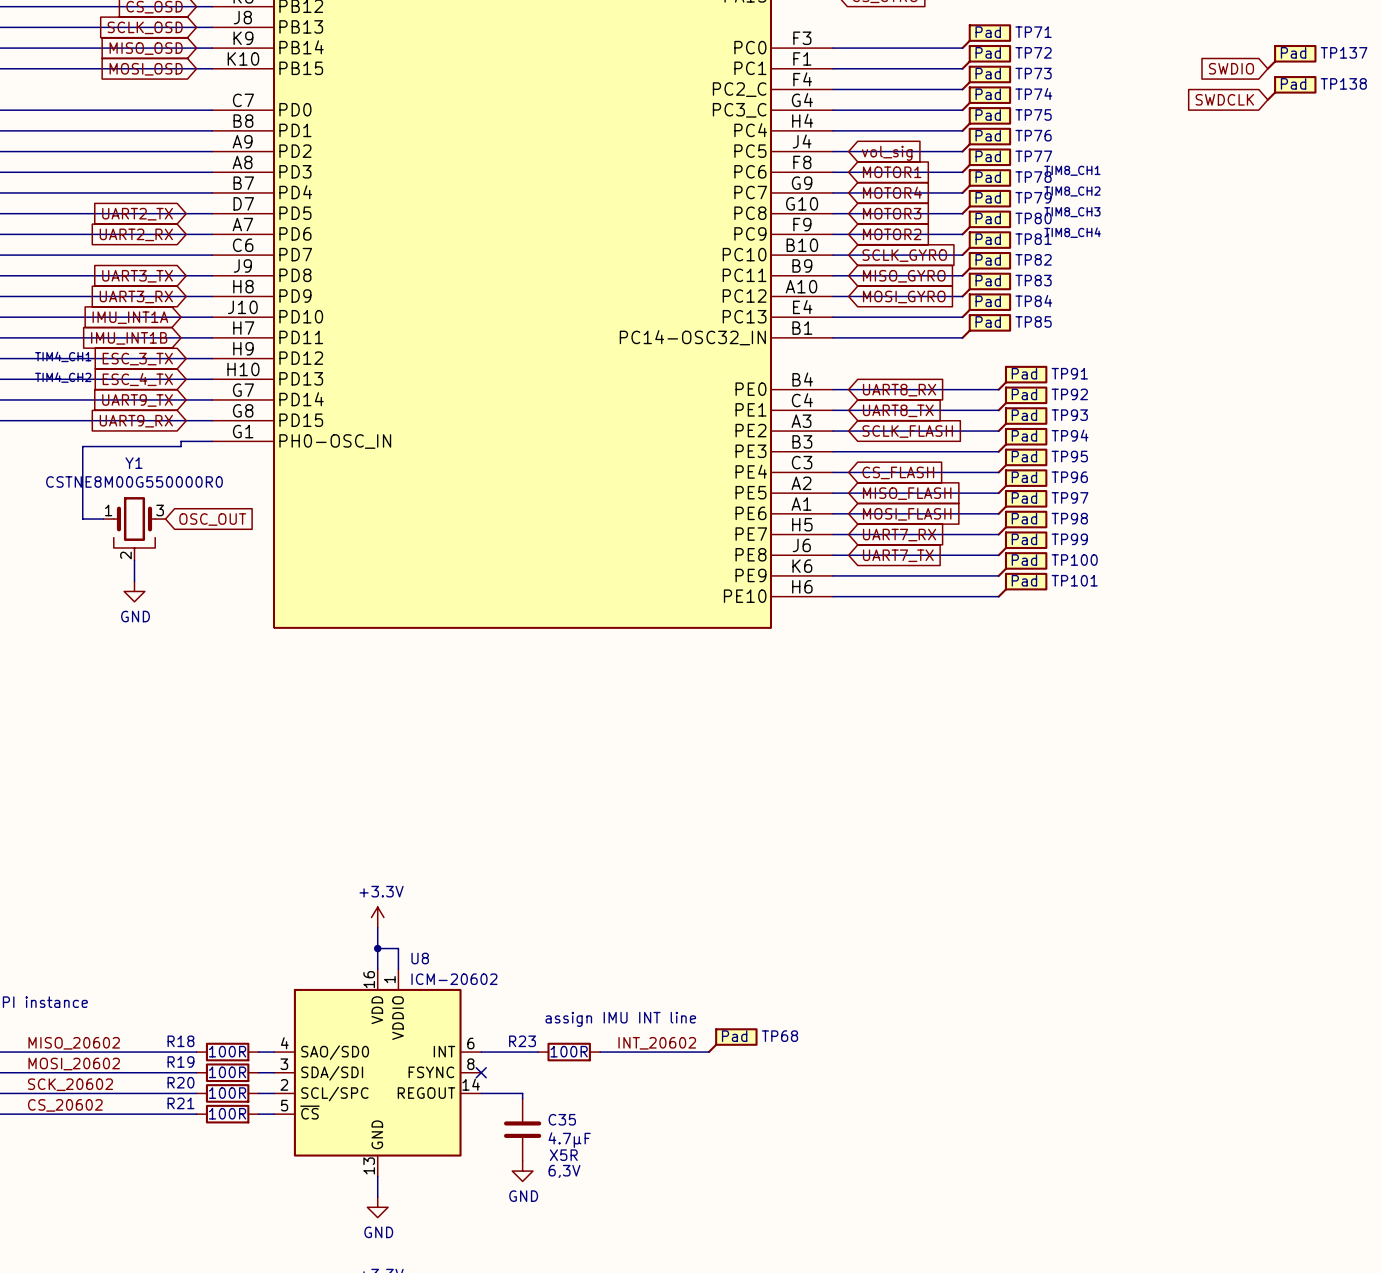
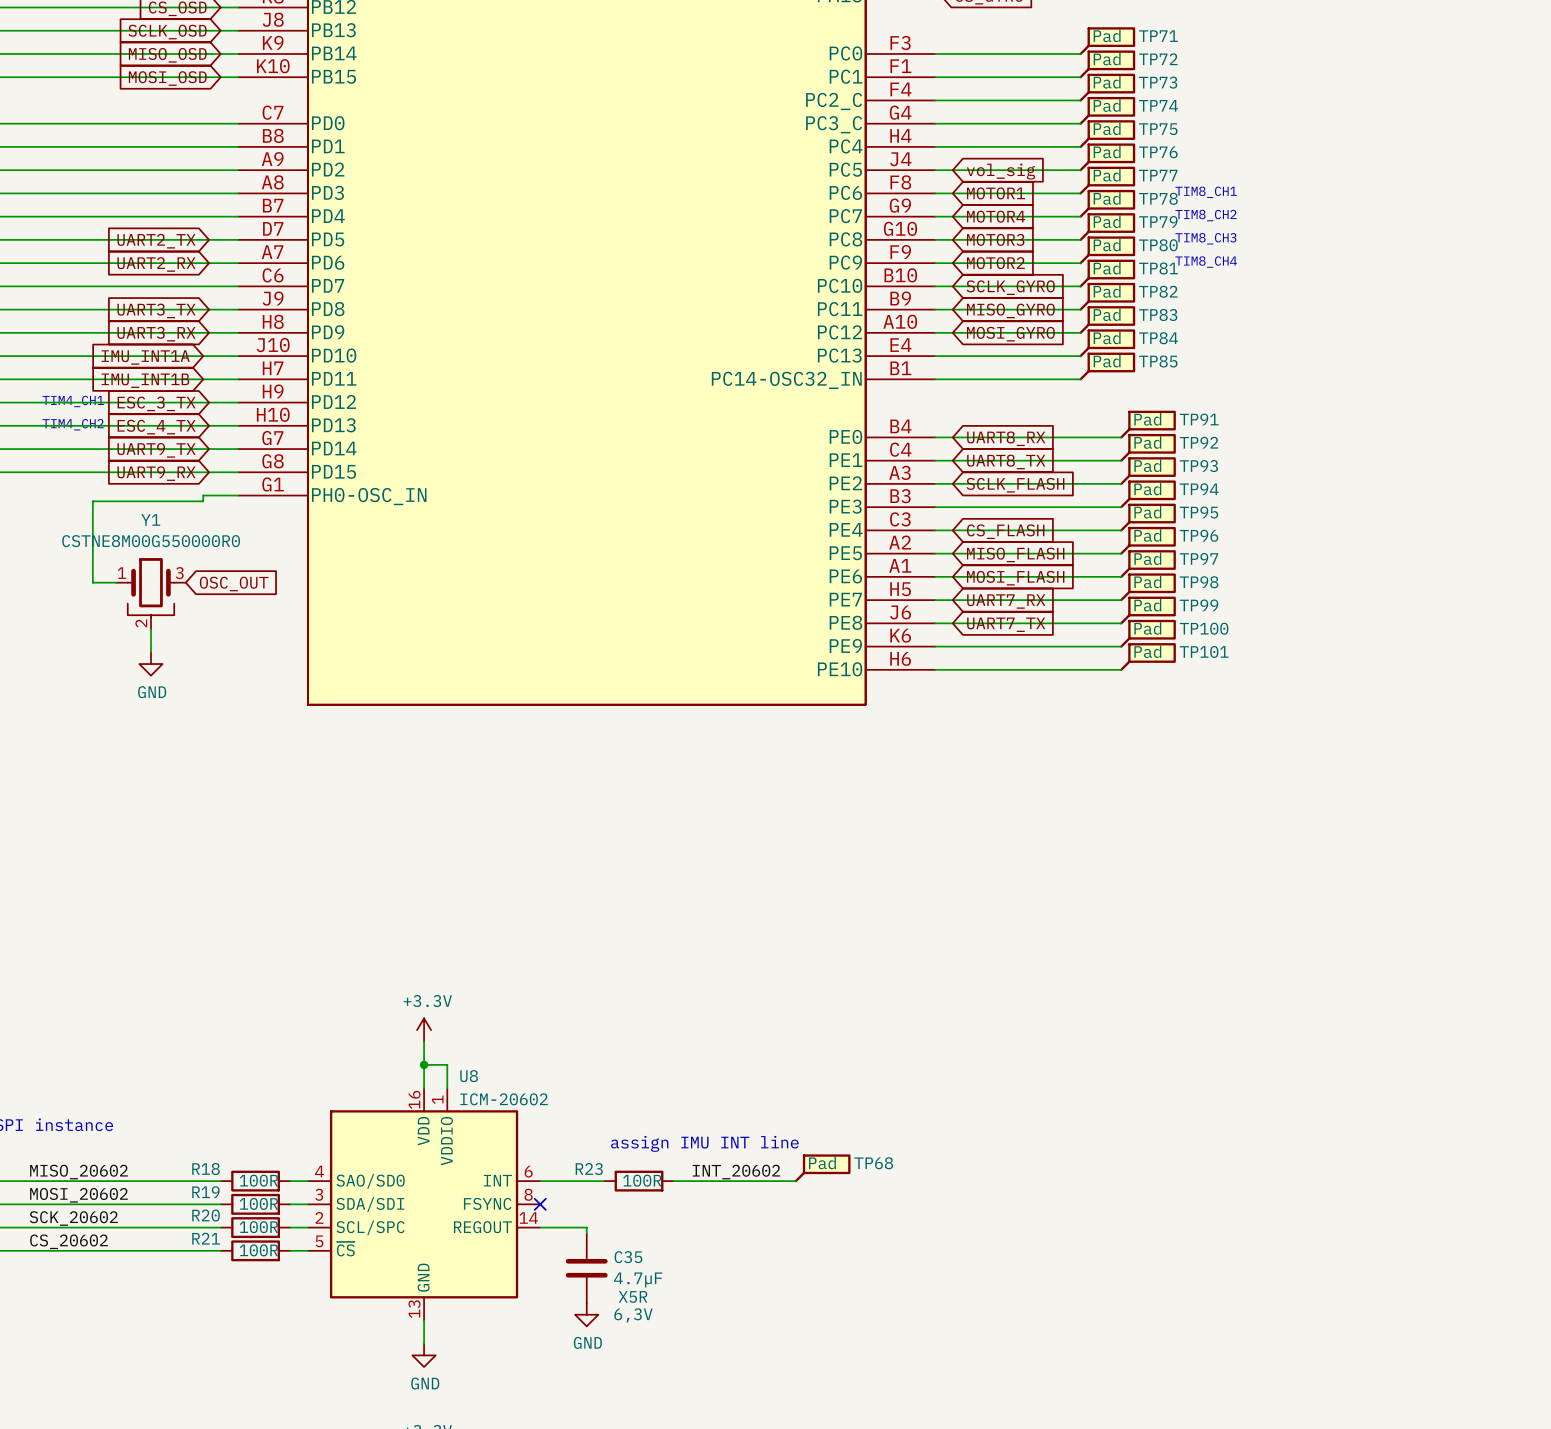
TP137: Pad (1291, 57) -> none
global label: SWDIO (1231, 68) -> none
TP138: Pad (1291, 88) -> none
global label: SWDCLK (1224, 99) -> none

